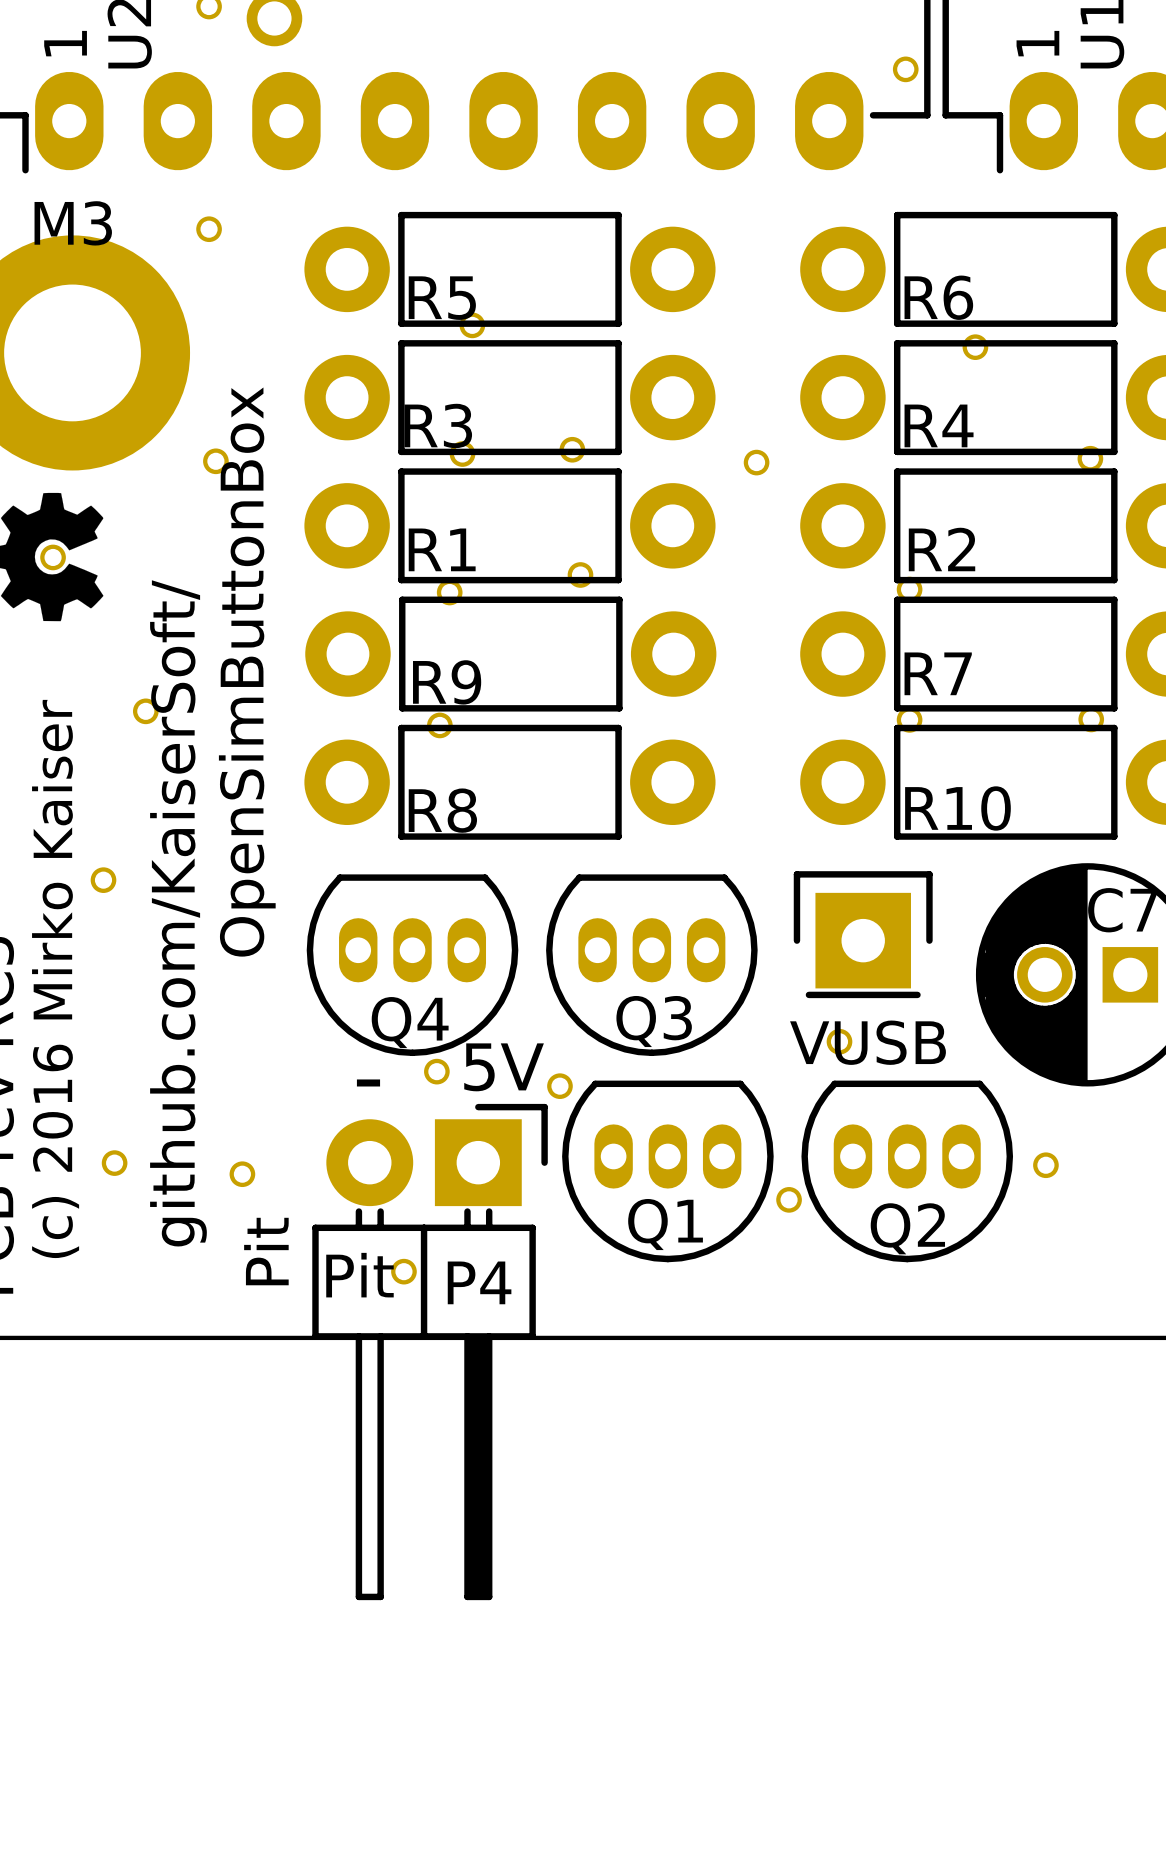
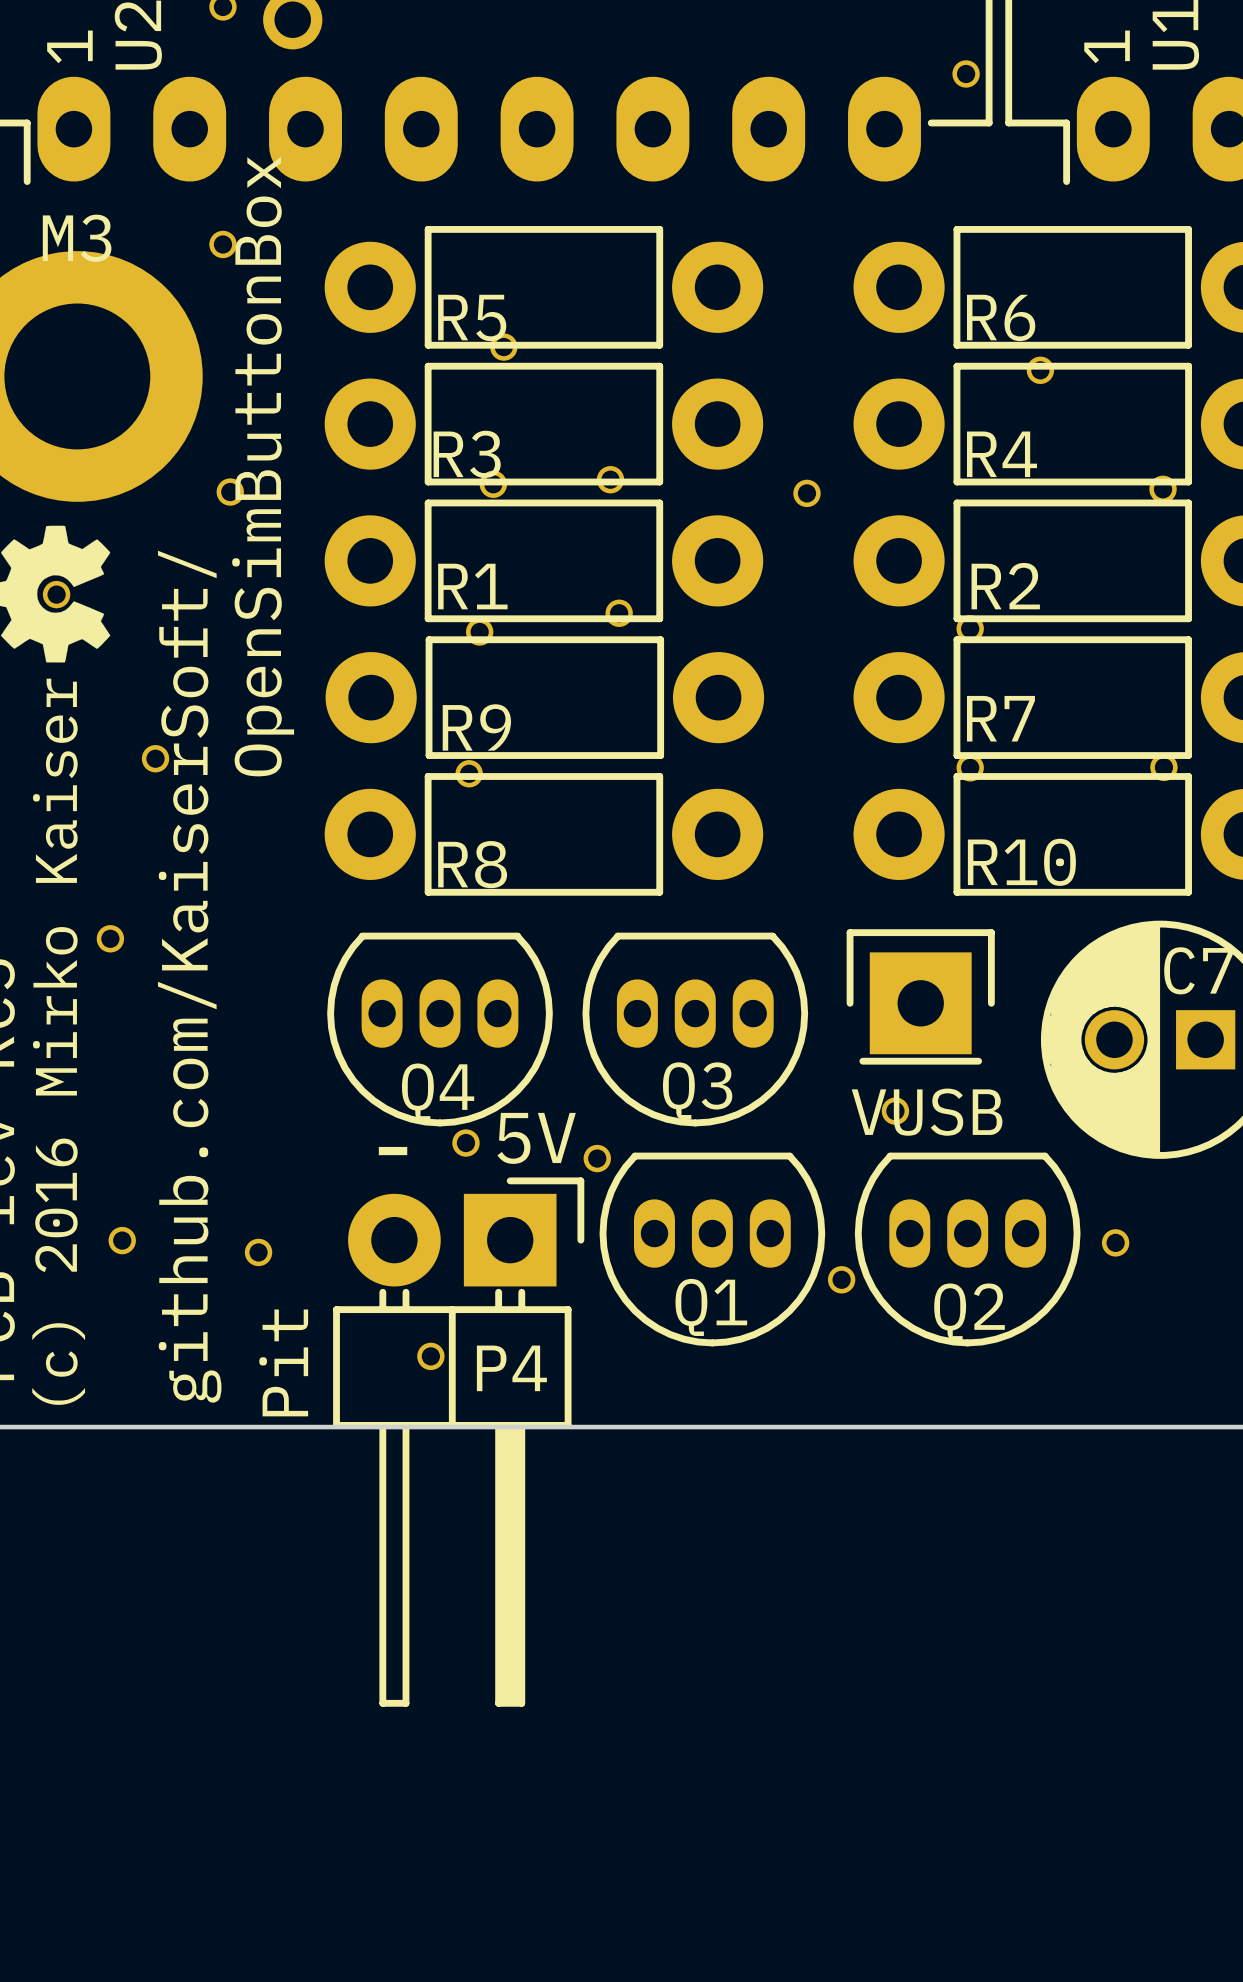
text: Pit (266, 1251) -> none
P4 value rotation: 0° (359, 1275) -> 90° counterclockwise (283, 1362)

